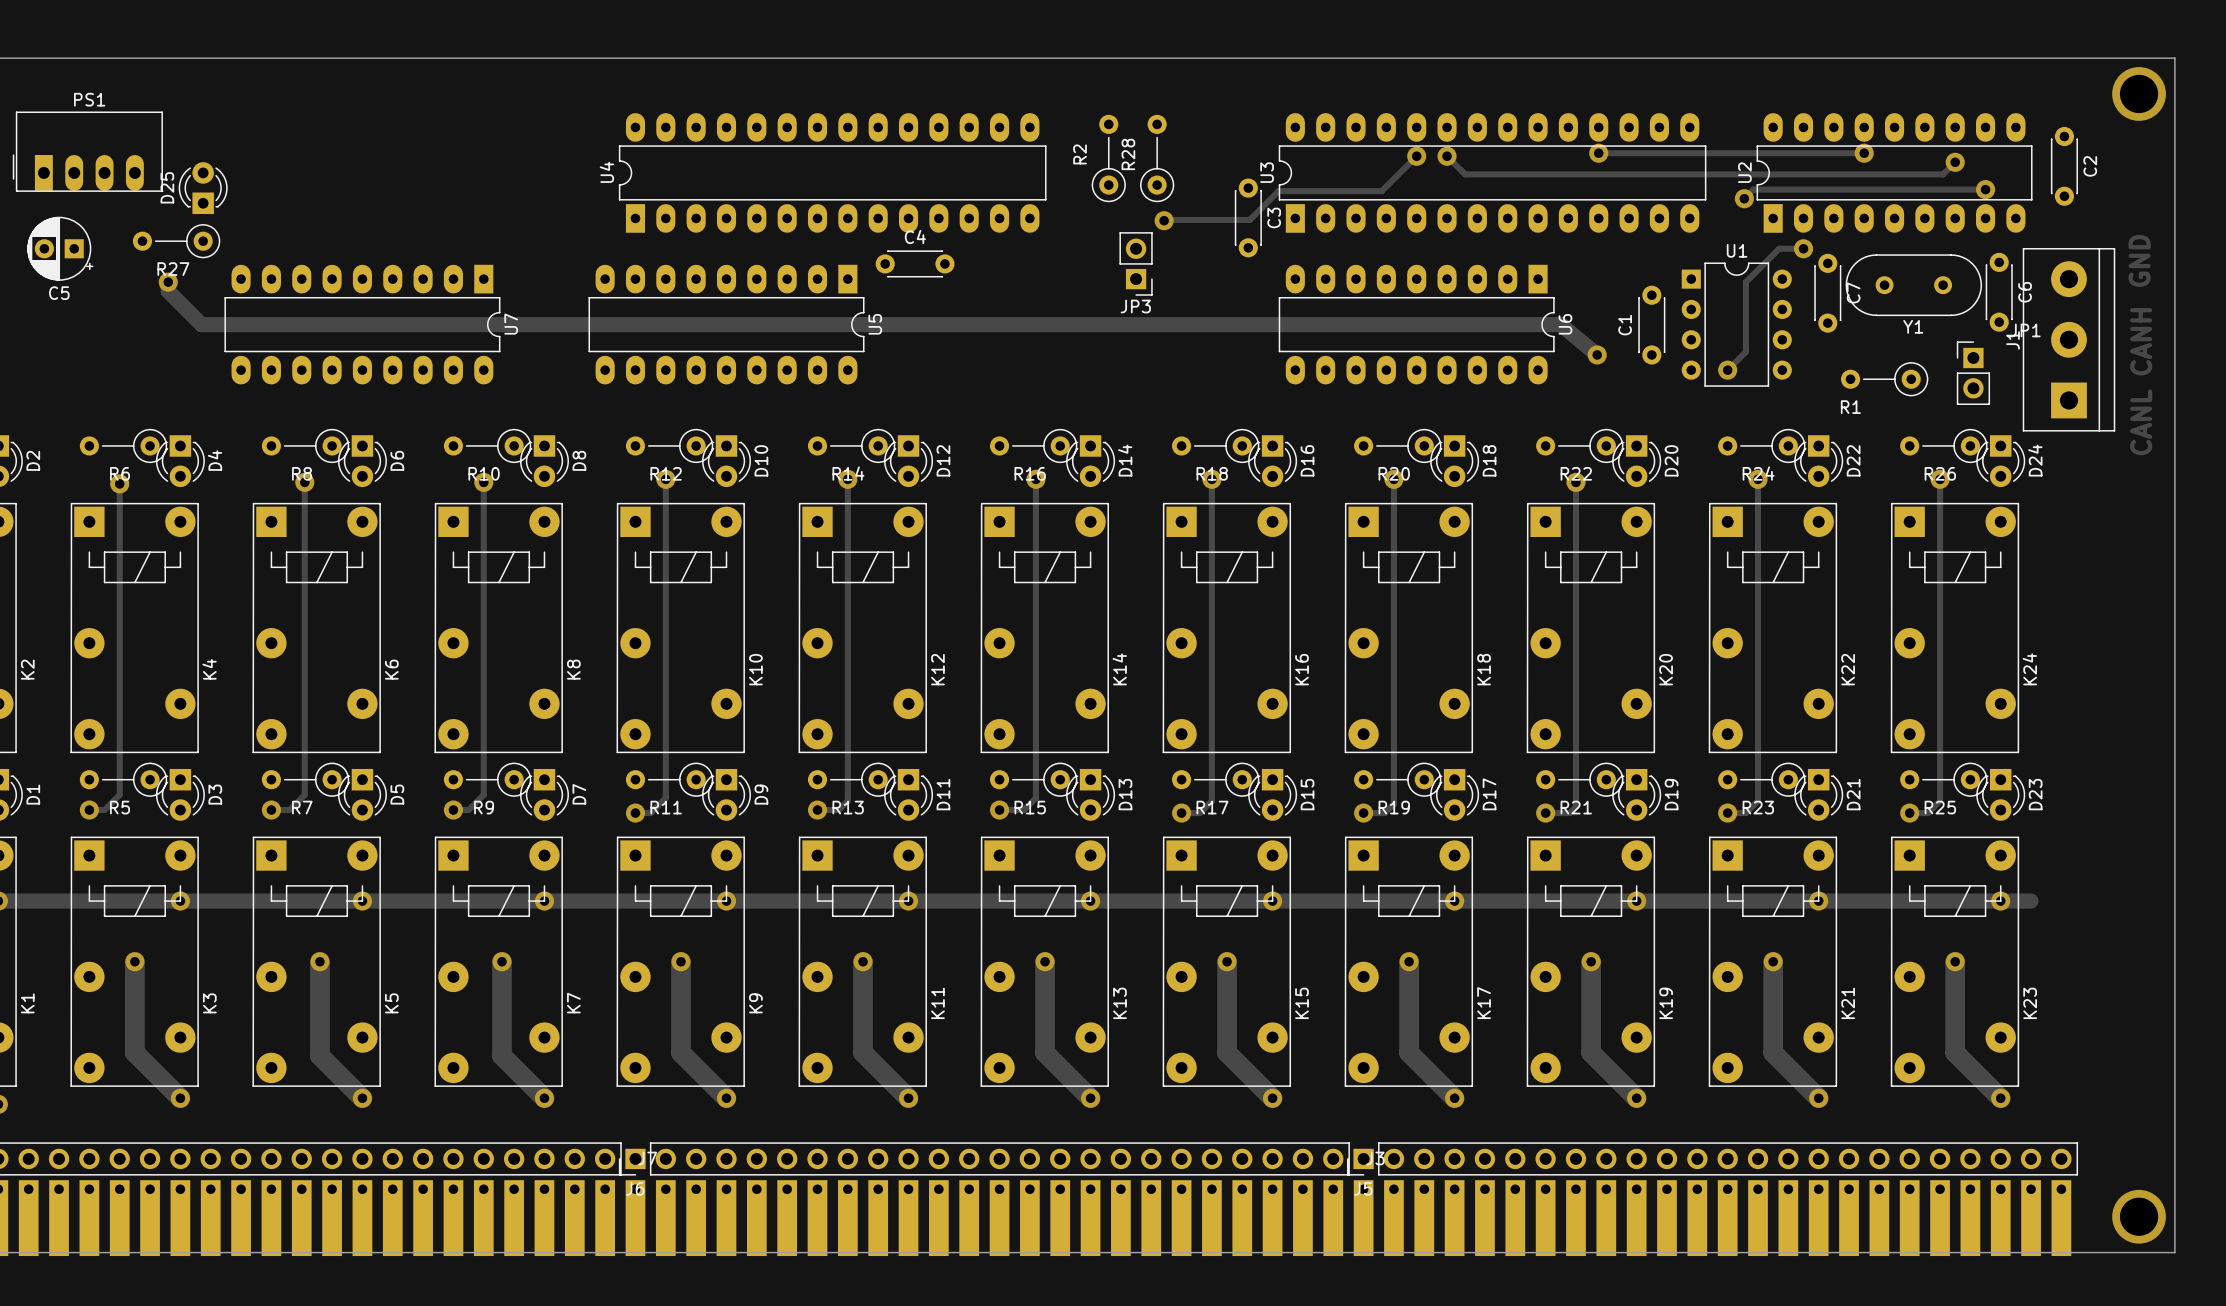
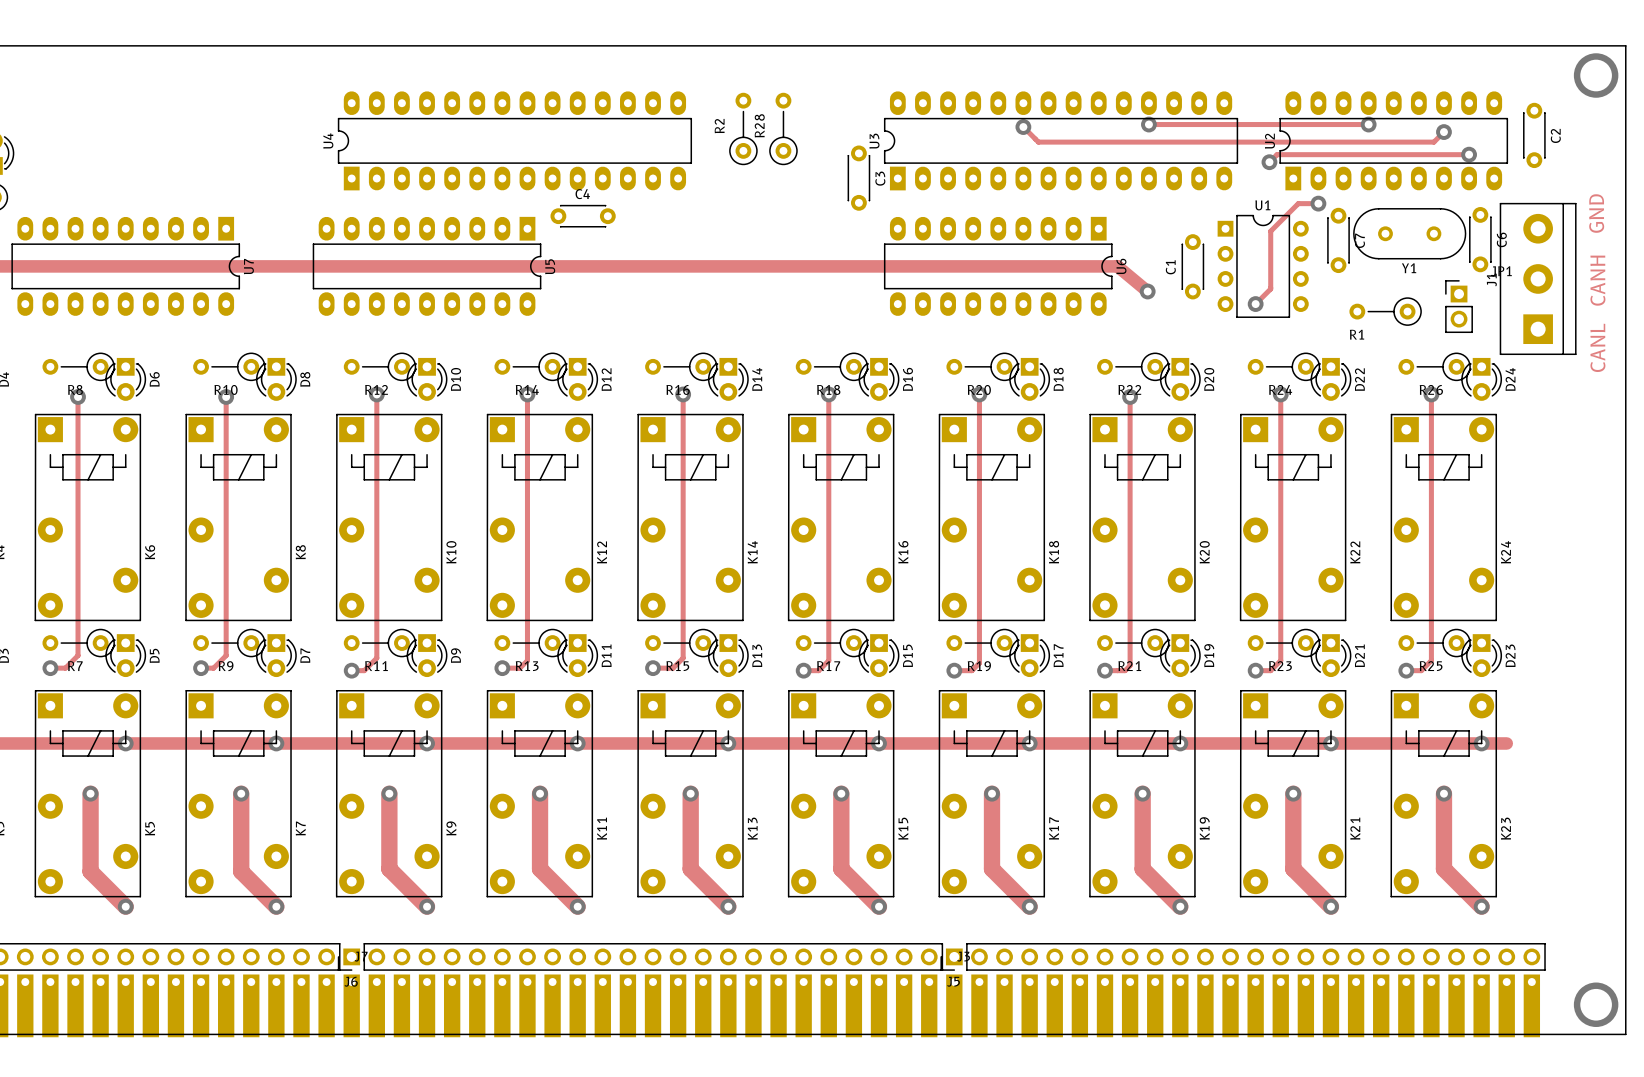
track: (1416, 156) (1381, 191) (1278, 191) (1249, 219) (1164, 220) -> none
via: (1416, 156) -> none
via: (1164, 220) -> none
JP3: (1136, 263) -> none

